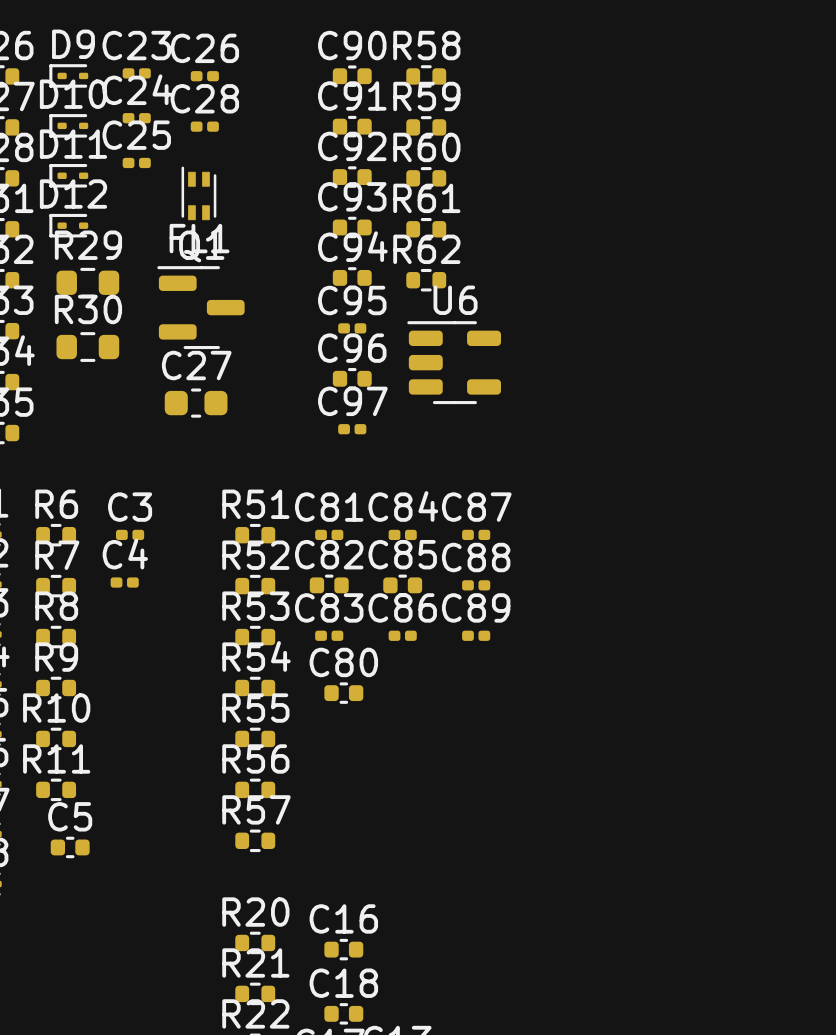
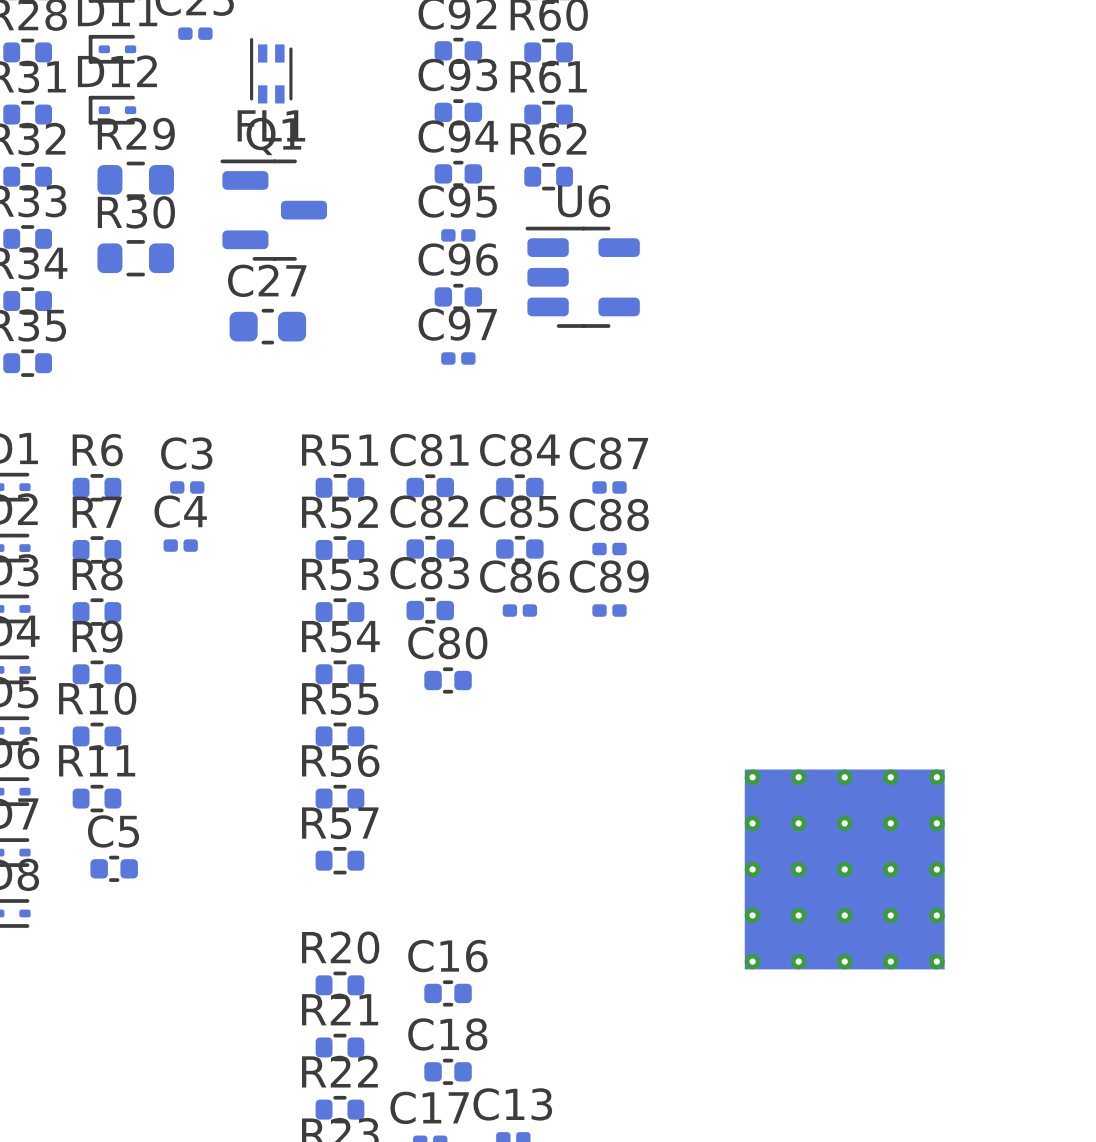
C81 footprint: [315, 529, 344, 541] -> [406, 474, 454, 501]
C84 footprint: [388, 529, 417, 541] -> [496, 474, 544, 501]
C83 footprint: [315, 630, 344, 641] -> [406, 597, 454, 624]
part: none -> (844, 869)

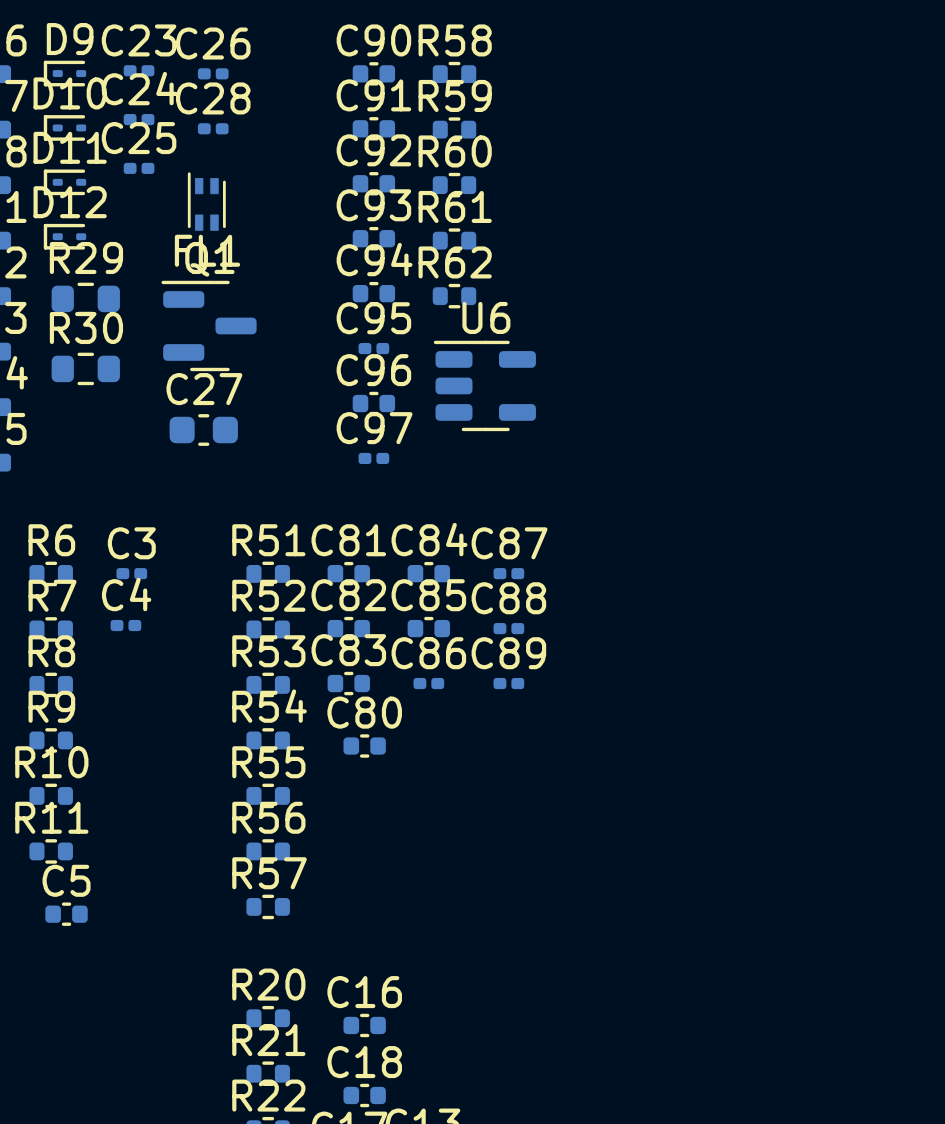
part: (844, 869) -> none

